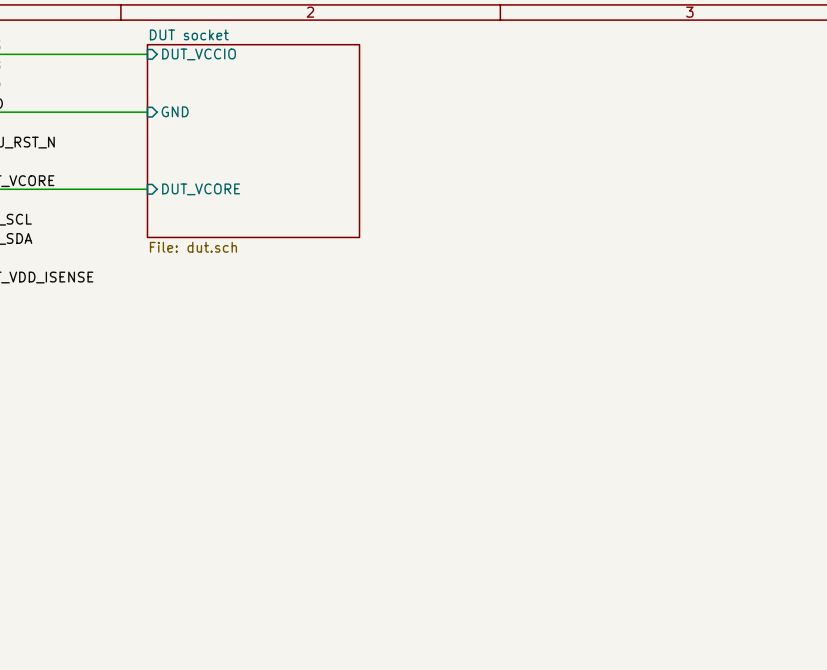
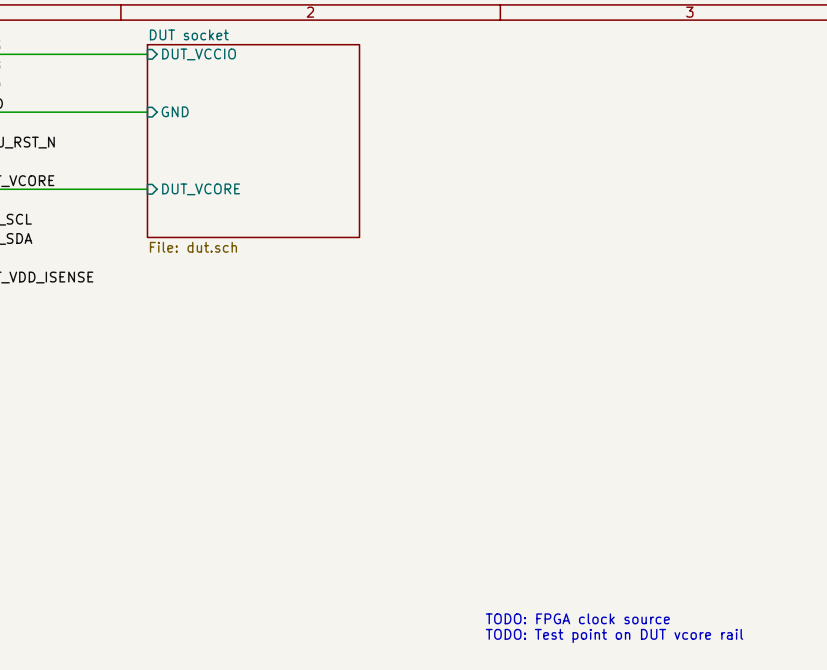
text: none -> TODO: FPGA clock source (577, 618)
text: none -> TODO: Test point on DUT vcore rail (614, 635)

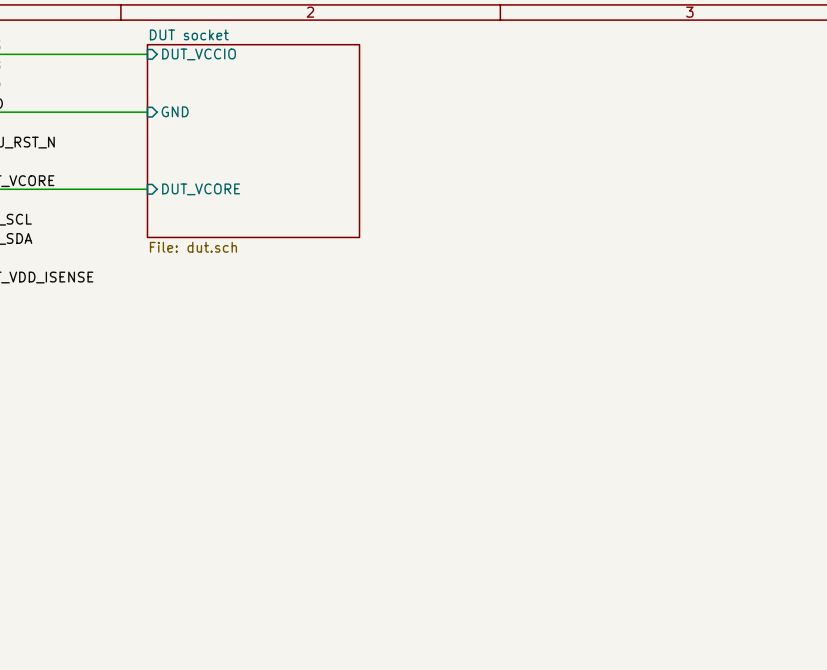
text: TODO: FPGA clock source (577, 618) -> none
text: TODO: Test point on DUT vcore rail (614, 635) -> none

